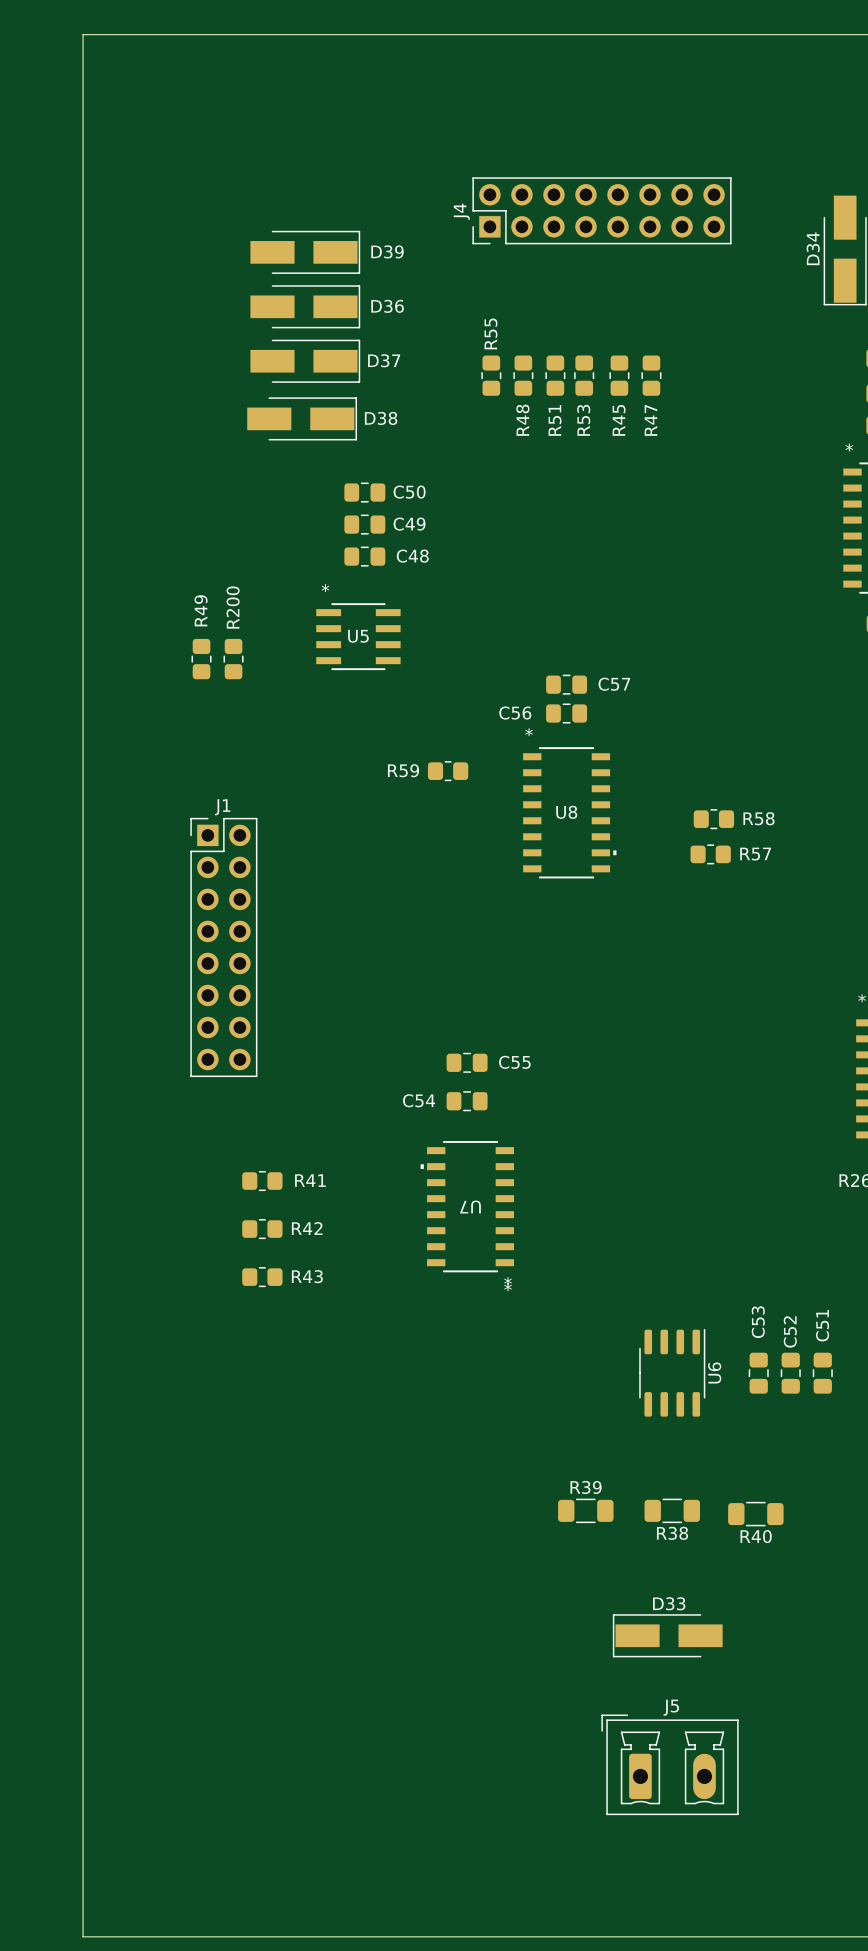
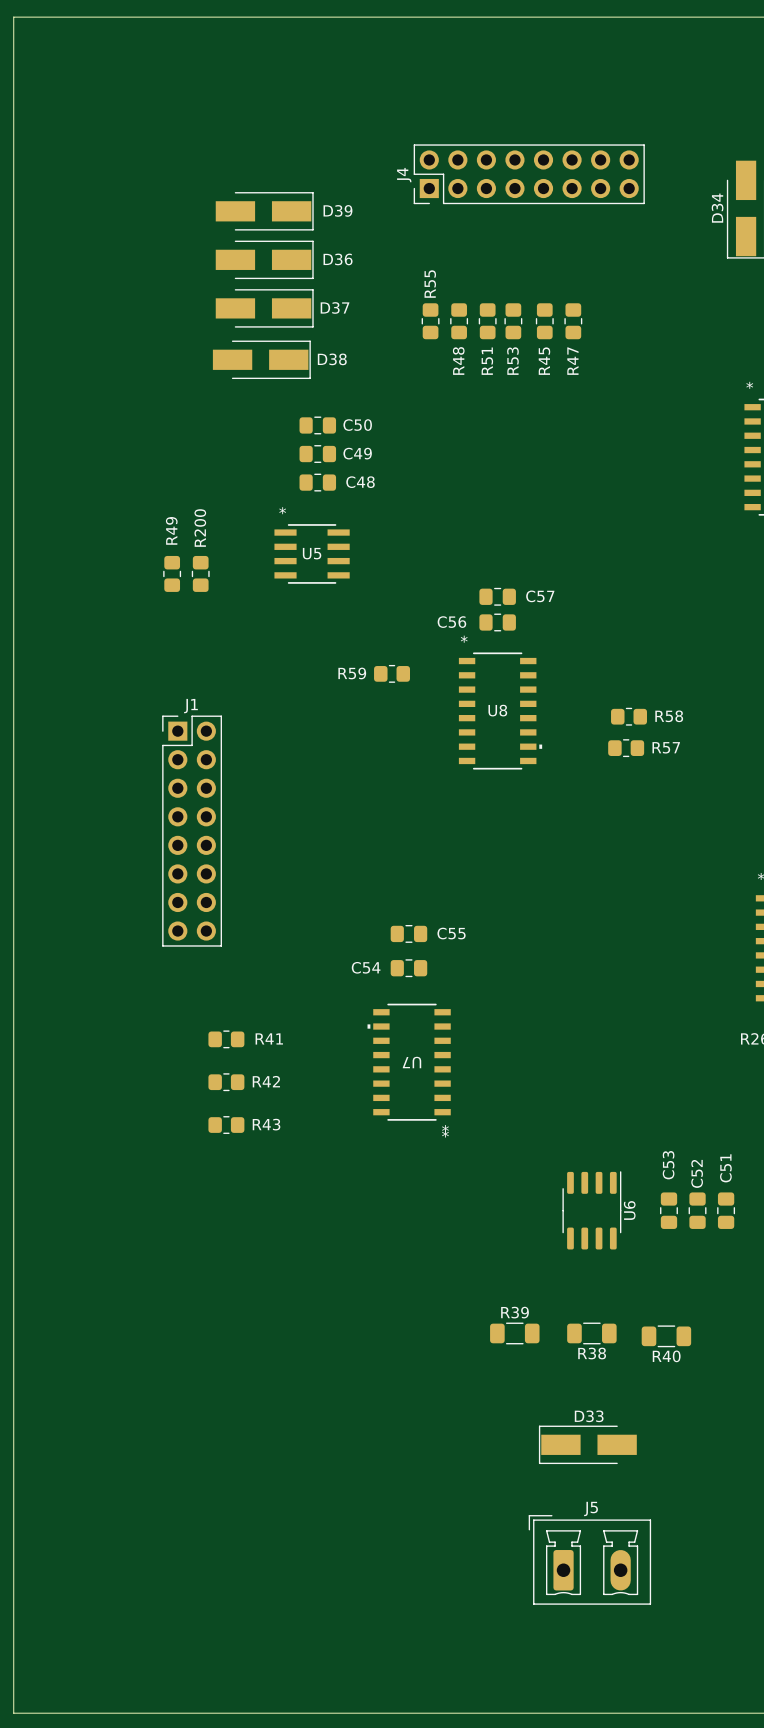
board edge: (83, 34) (83, 1936) -> (66, 17) (13, 17) (13, 1713) (66, 1713)

